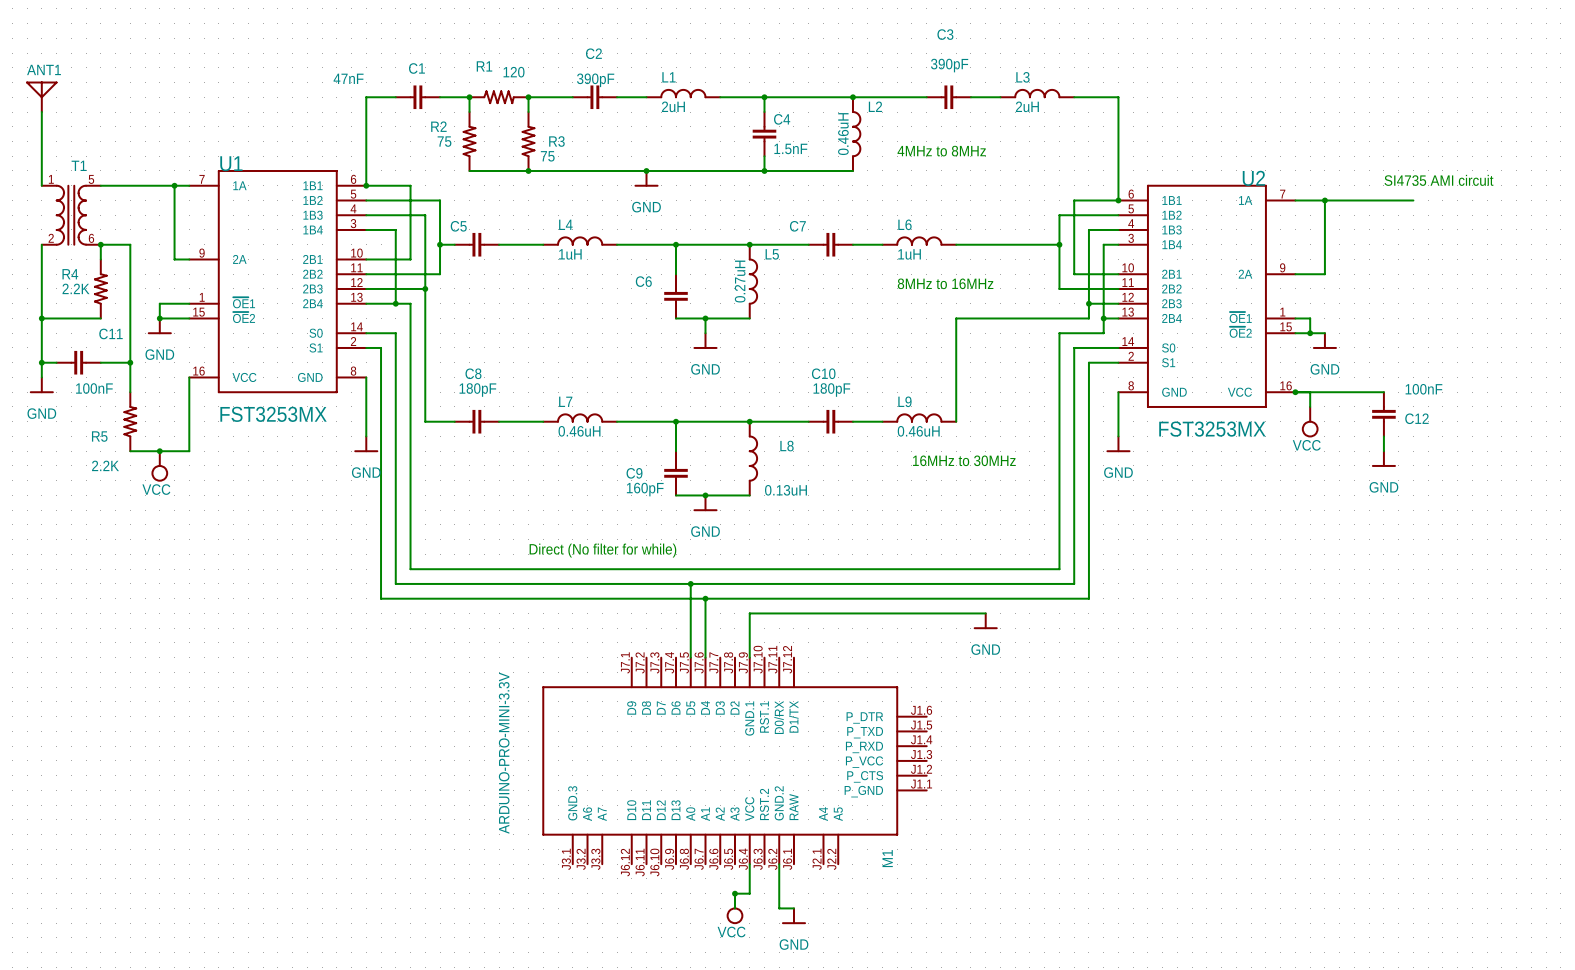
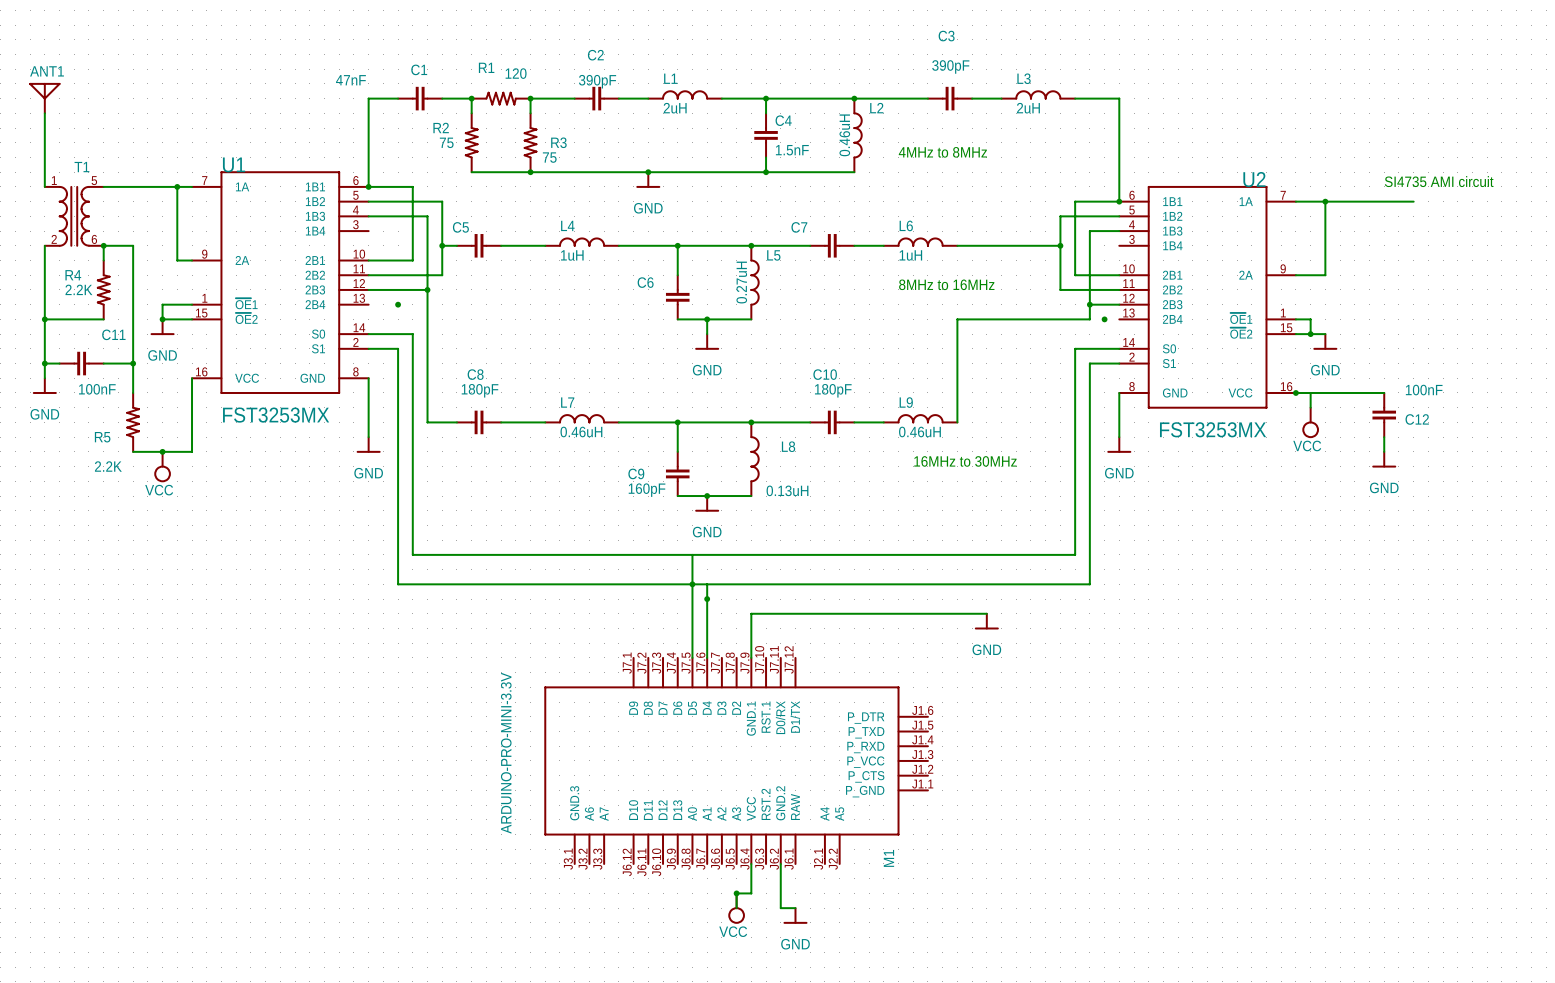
wire: (366, 229) (395, 229) (395, 303) -> none
wire: (1118, 244) (1103, 244) (1103, 333) (1059, 333) (1059, 569) (410, 569) (410, 554) -> (1075, 554) (412, 554)
wire: (366, 303) (410, 303) (410, 333) -> none
wire: (1103, 318) (1118, 318) -> none
wire: (395, 333) (395, 347) -> (398, 334) (412, 334)
wire: (381, 347) (381, 598) (1088, 598) (1088, 583) -> (383, 348) (398, 348)
text: Direct (No filter for while) (602, 550) -> none
wire: none -> (692, 554) (692, 584)
wire: (1074, 554) (1074, 583) -> (1089, 584) (1075, 584)
wire: none -> (707, 584) (707, 599)

